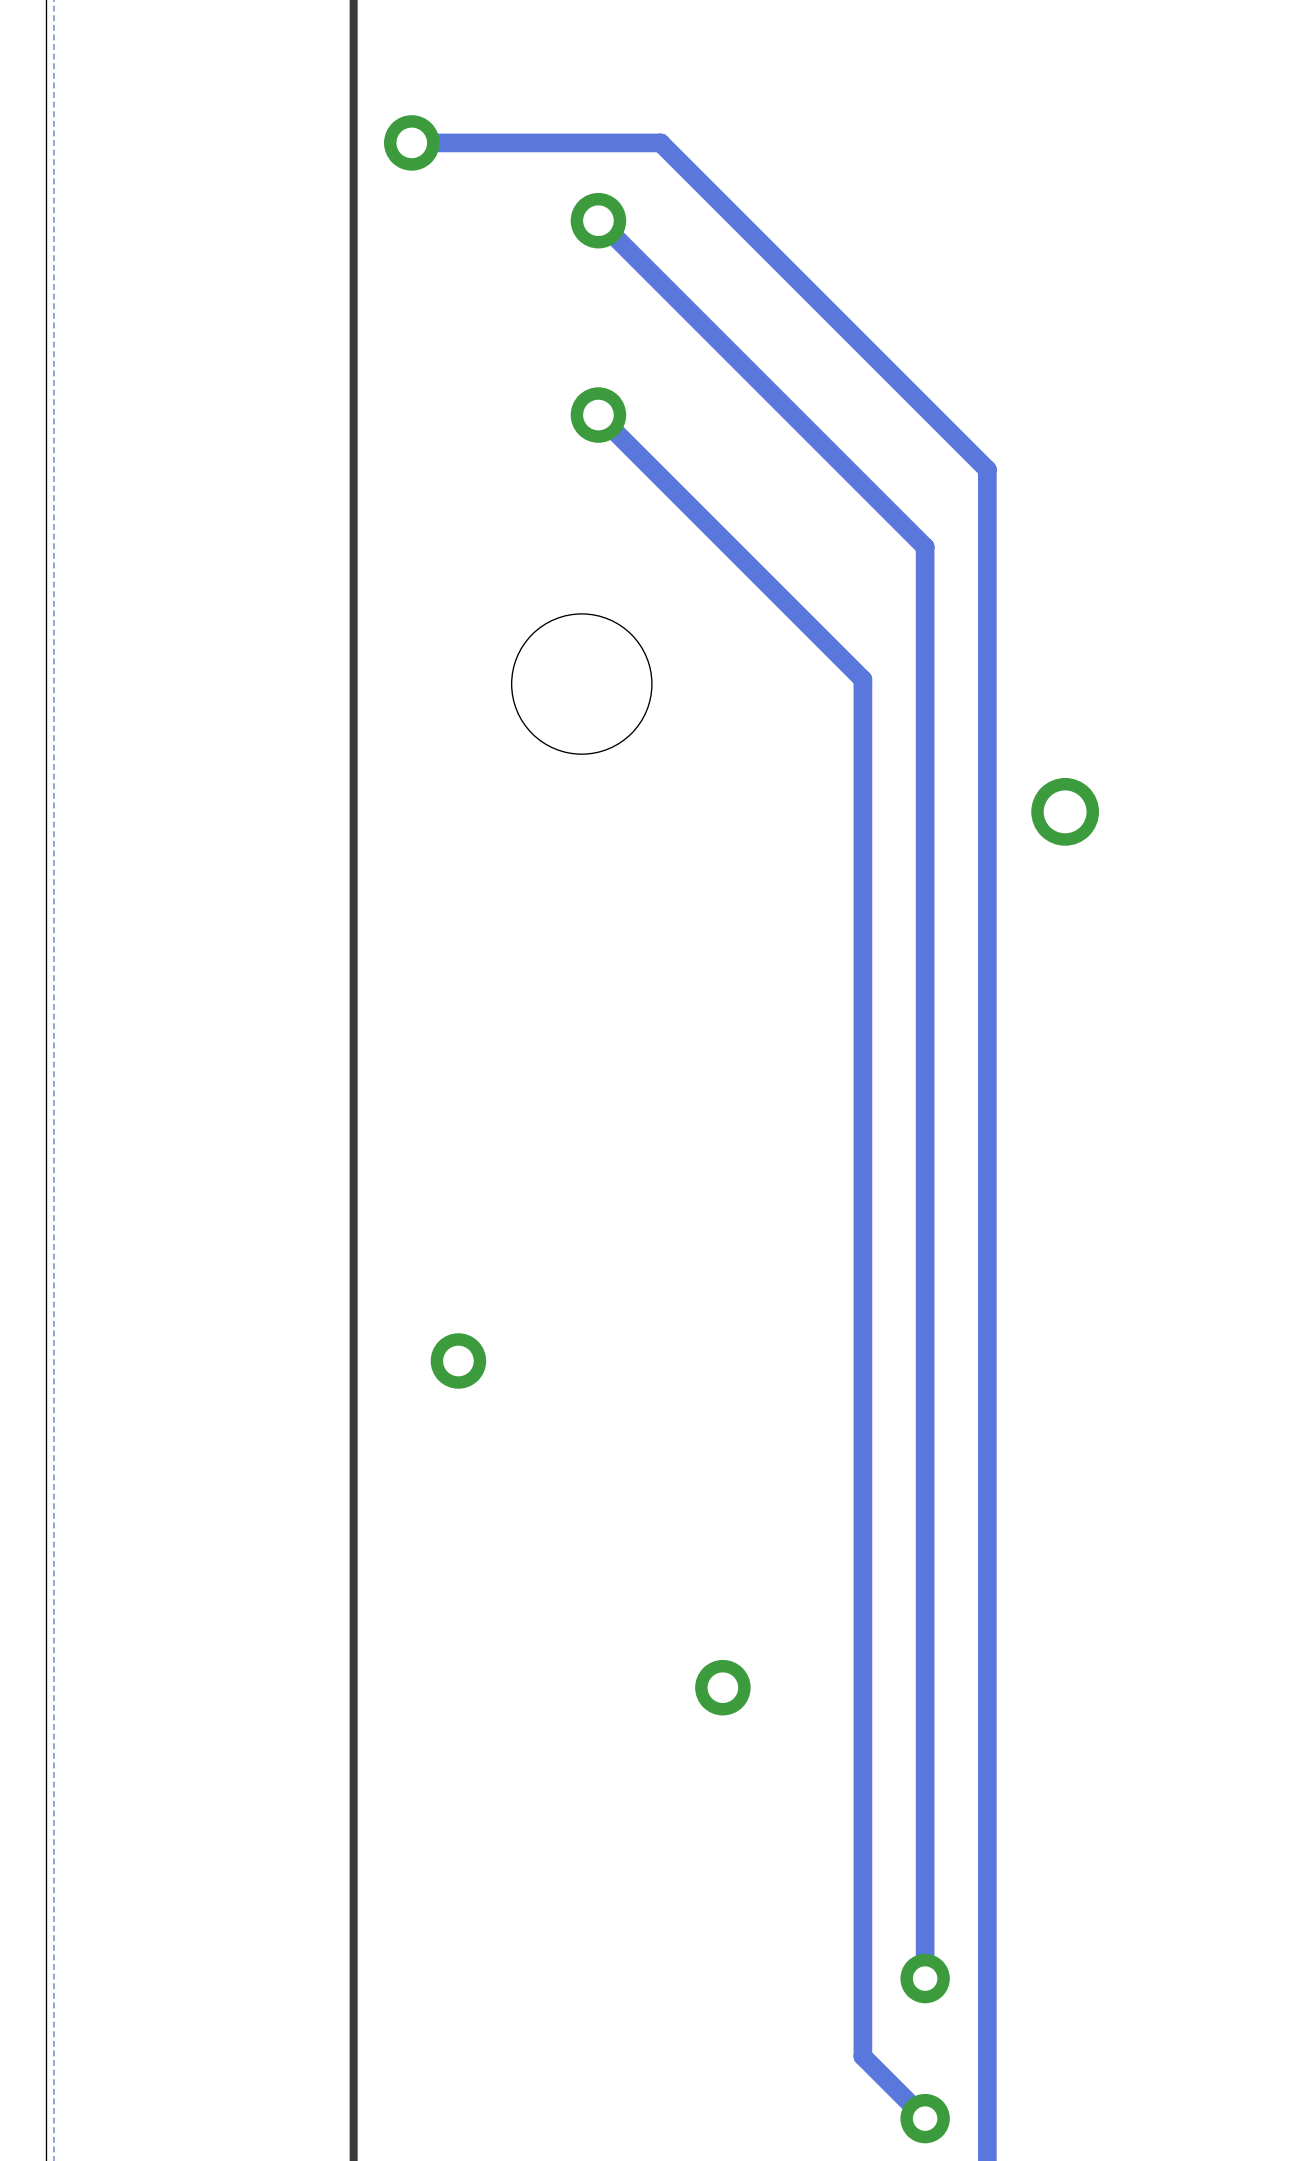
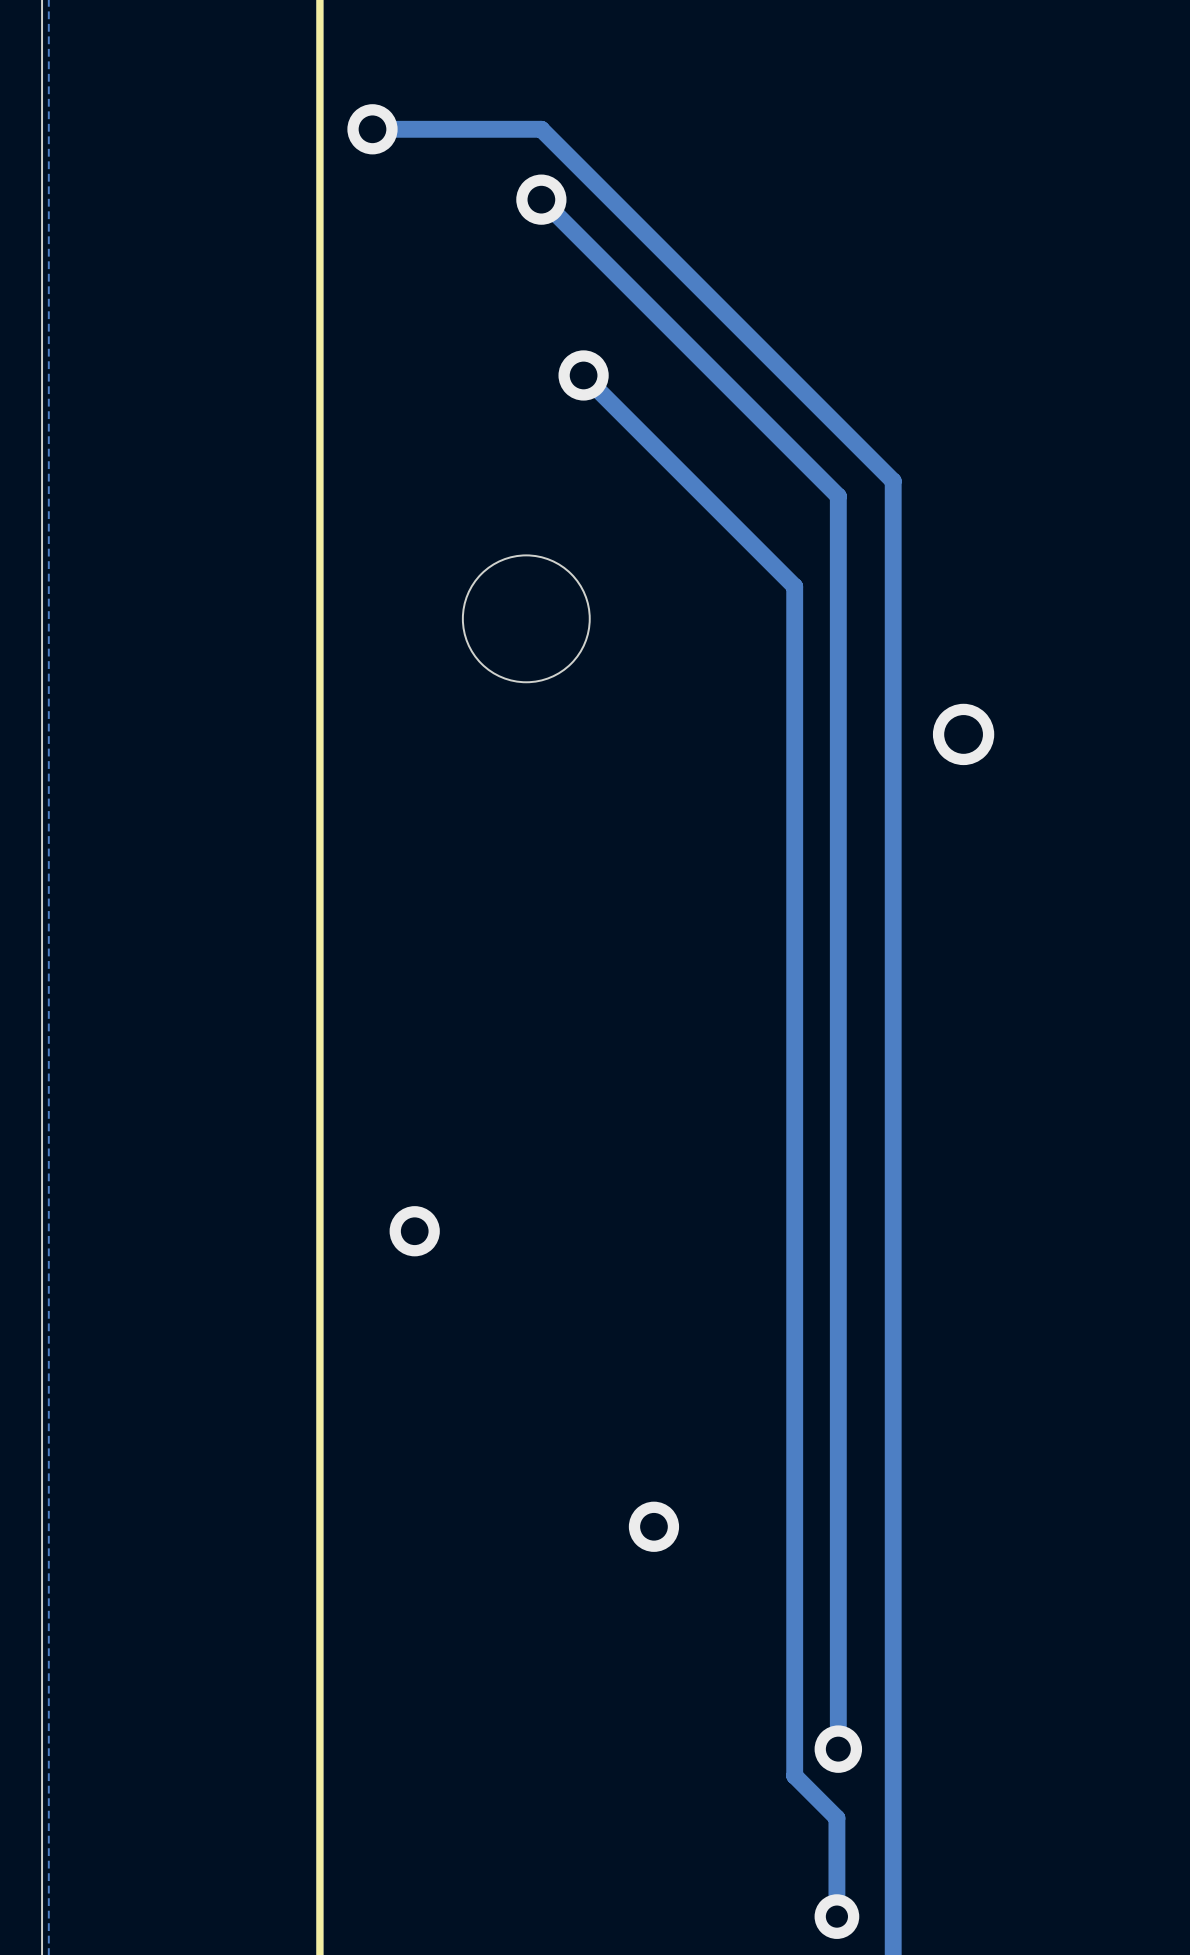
track: (598, 142) (660, 142) (987, 469) (987, 531) -> (541, 129) (893, 481)
track: (598, 415) (862, 679) (862, 2056) (925, 2118) -> (583, 375) (794, 586) (794, 1775) (836, 1818) (836, 1916)
via position: (598, 415) -> (583, 375)
track: (925, 547) (925, 1978) -> (836, 494) (838, 1749)
via position: (925, 1978) -> (838, 1749)

